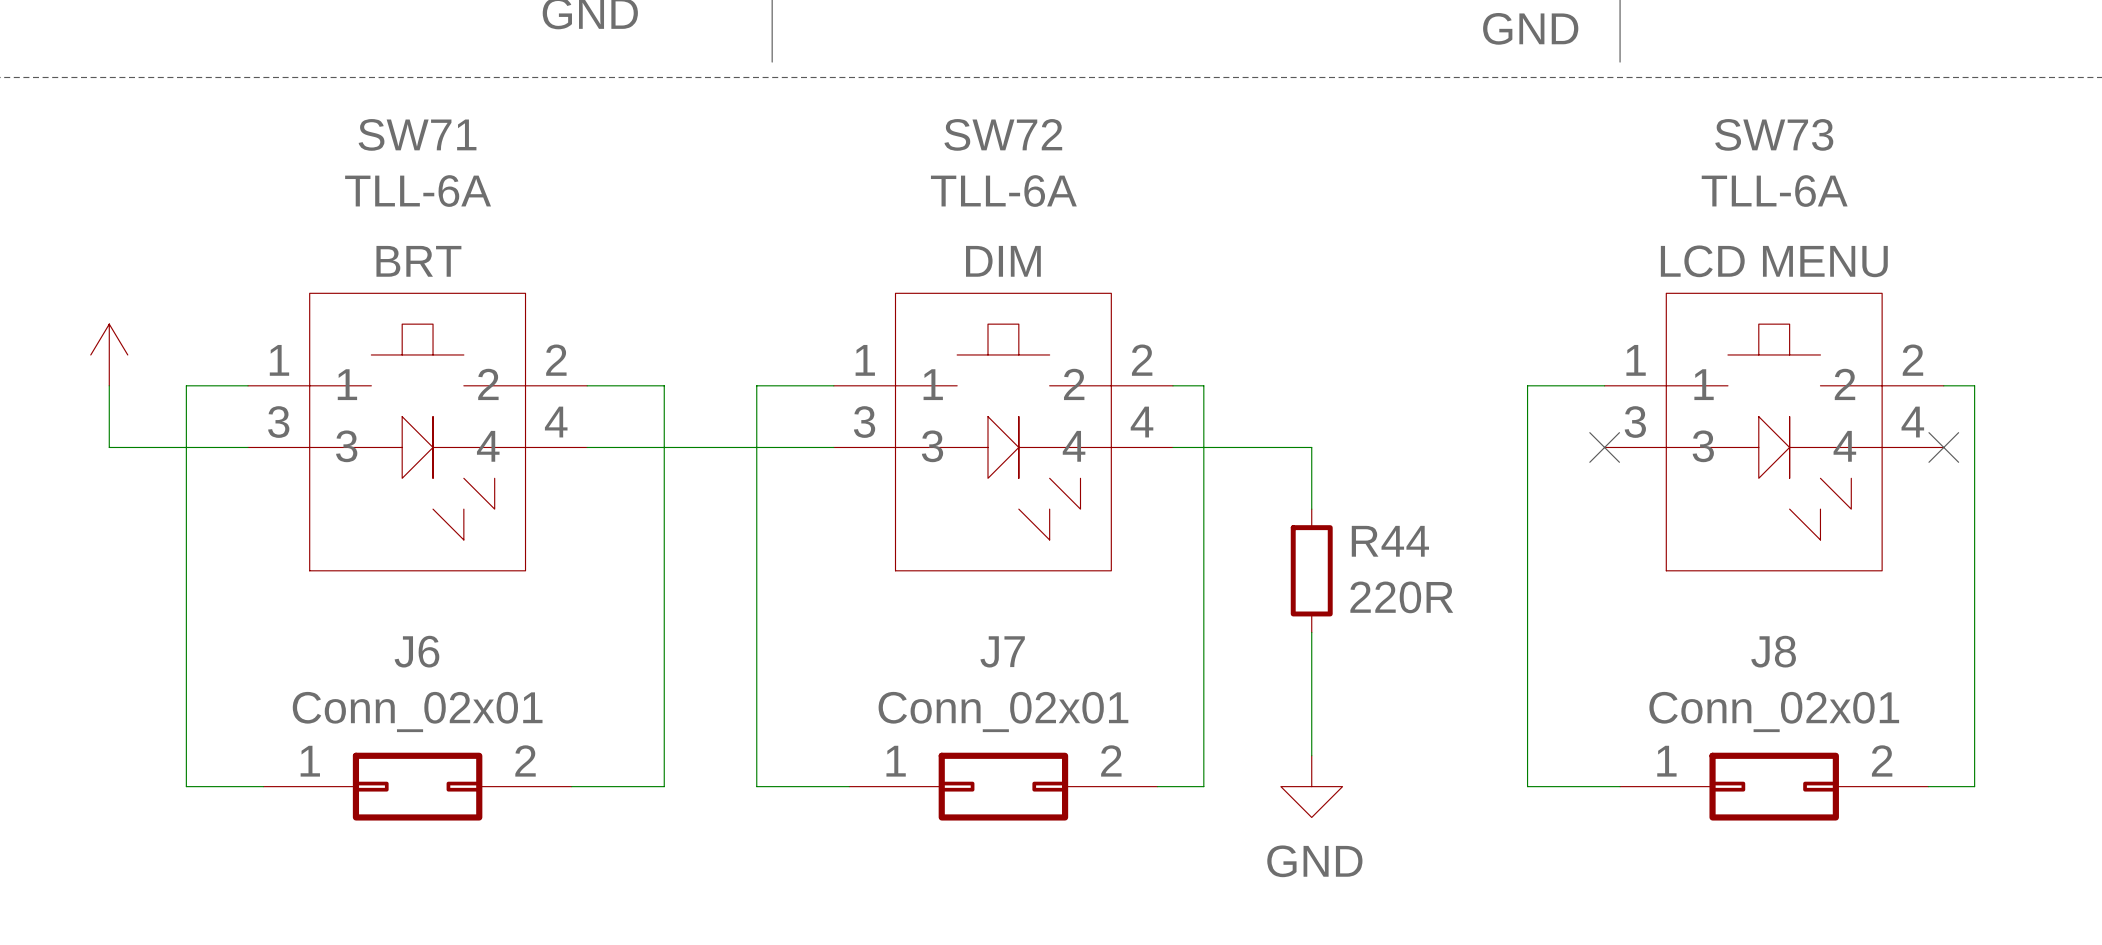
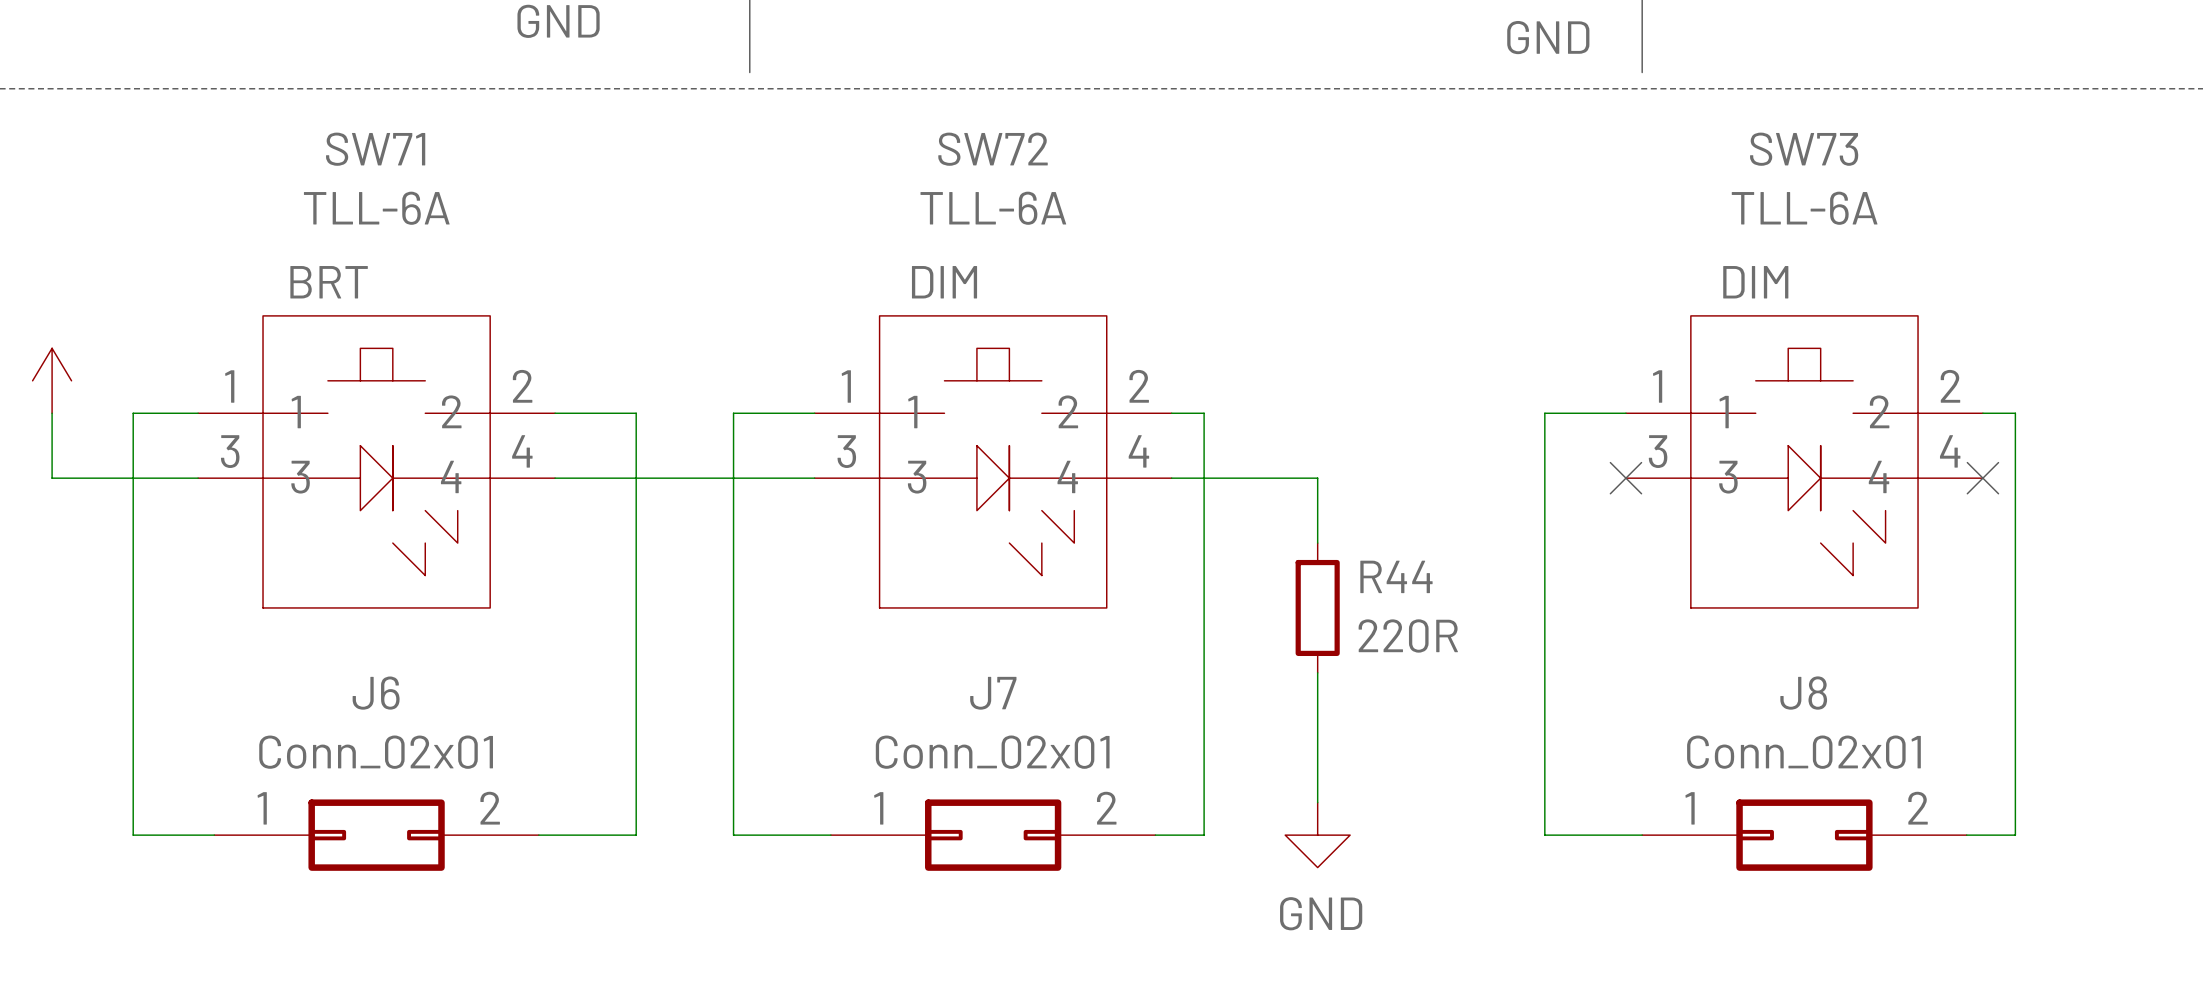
SW71 text position: BRT (418, 261) -> BRT (329, 282)
SW72 text position: DIM (1003, 261) -> DIM (944, 282)
SW73 text: LCD MENU (1774, 261) -> DIM (1755, 282)

